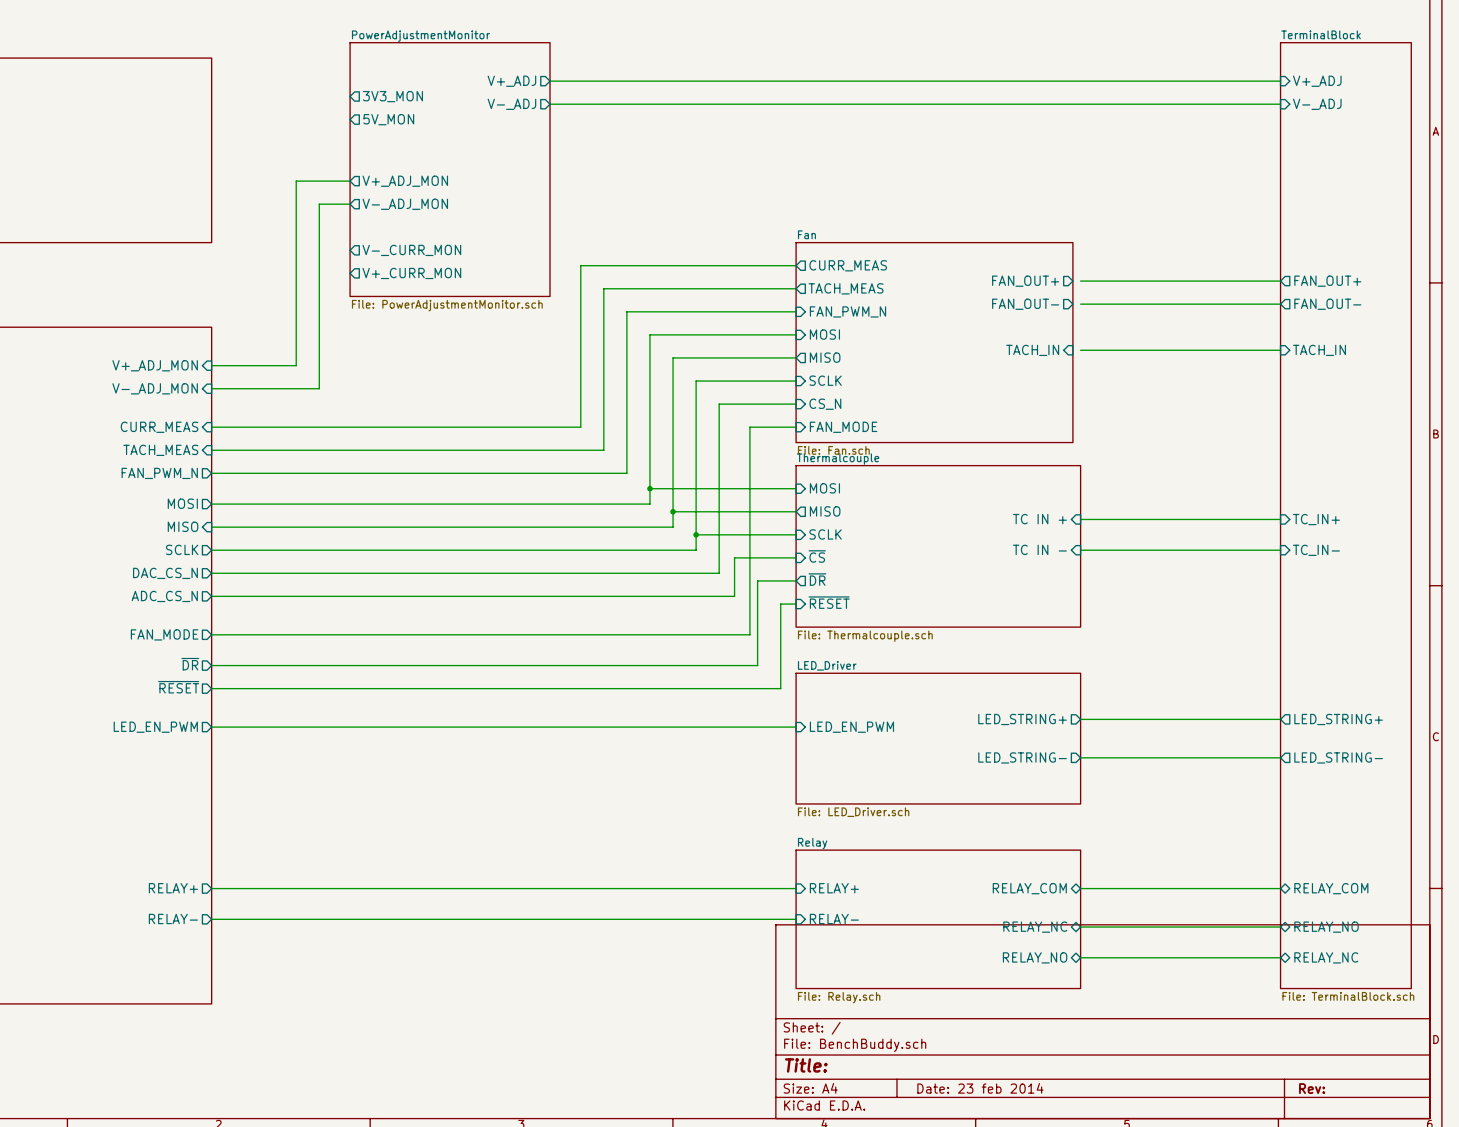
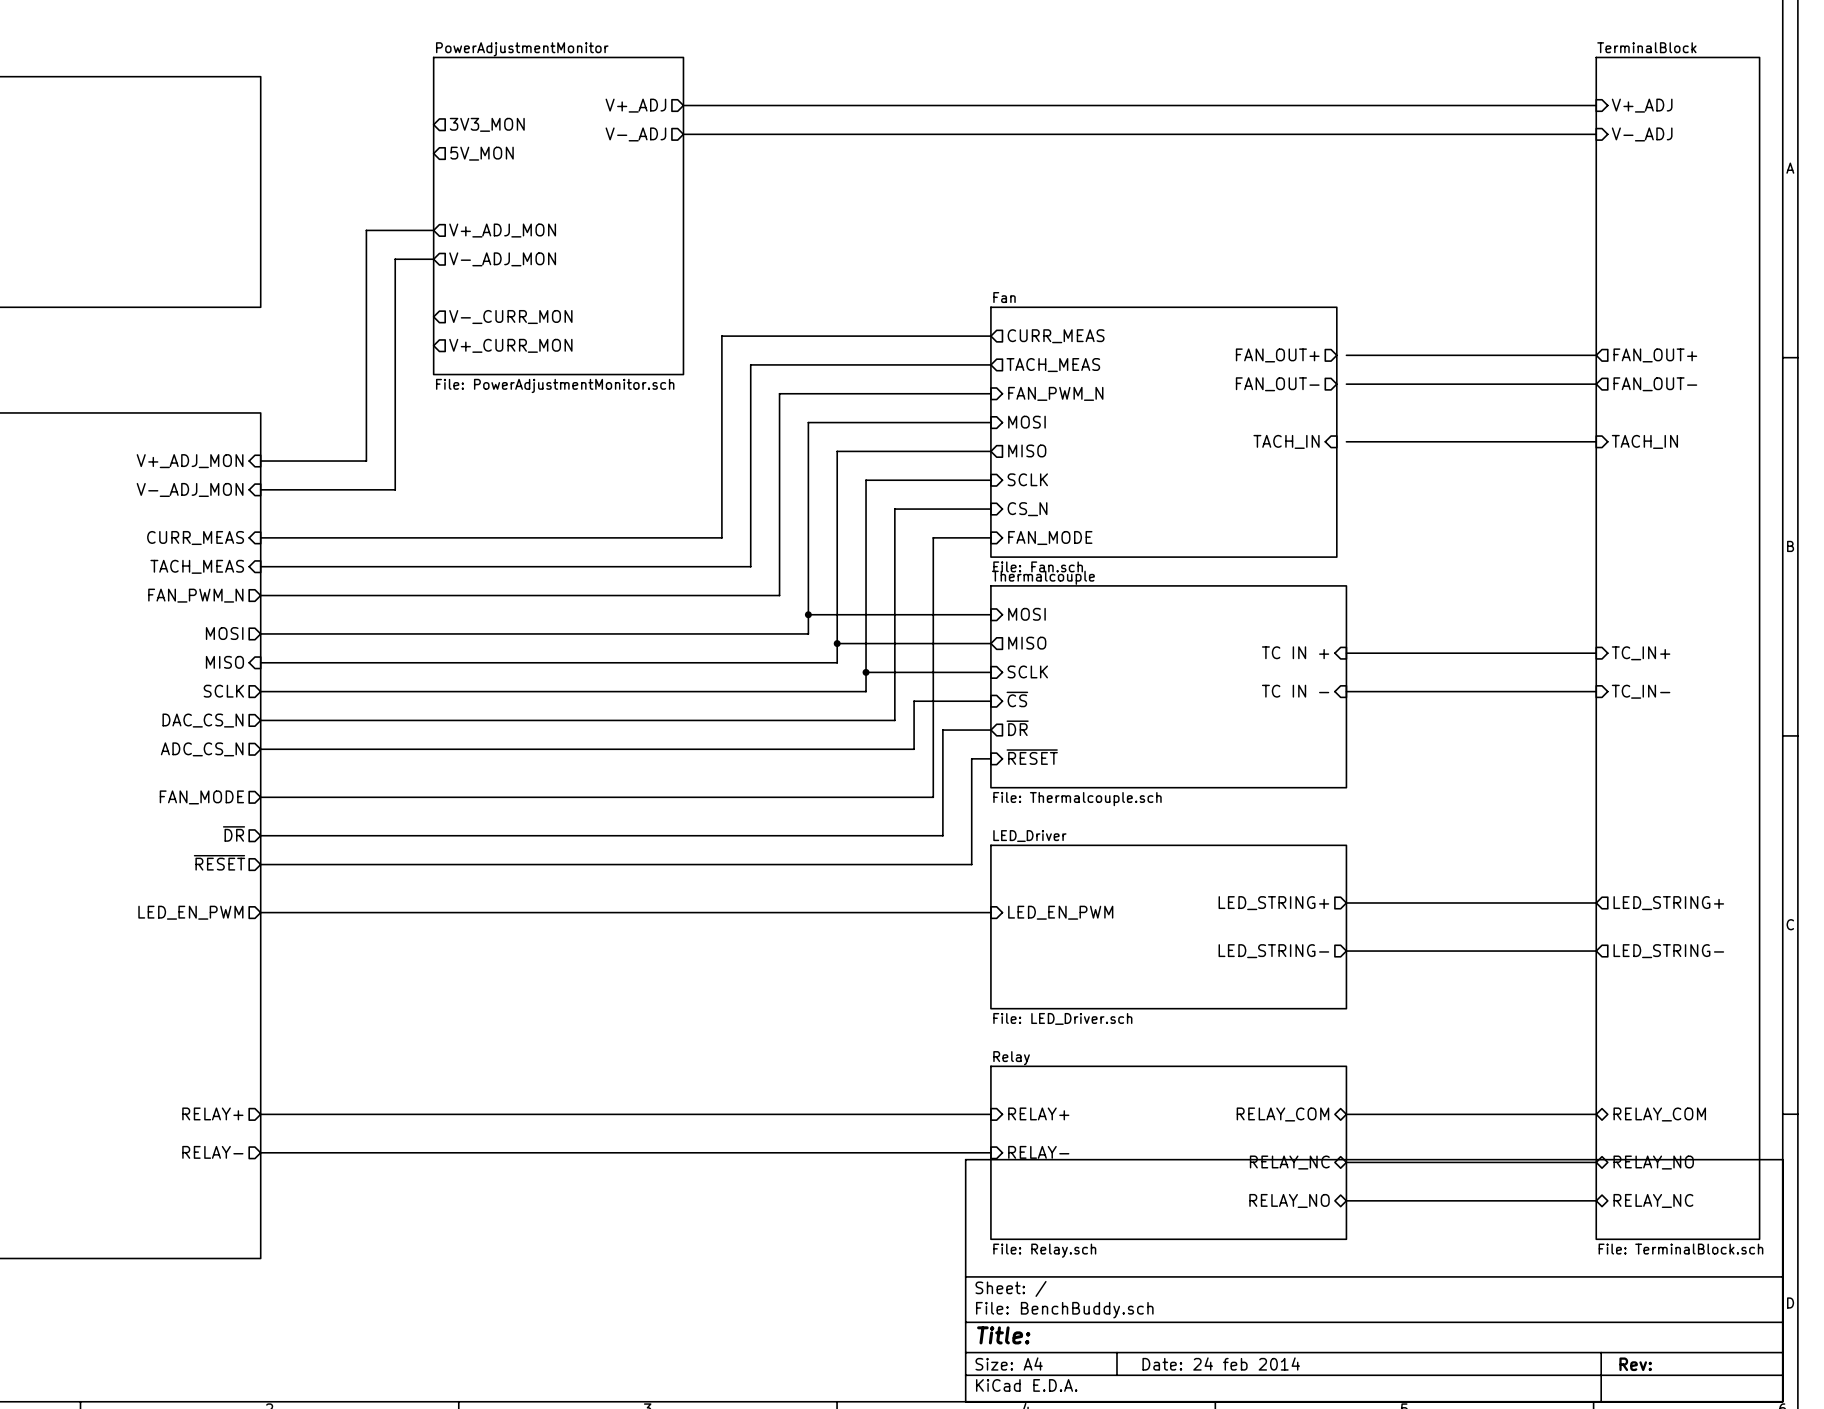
title block: Date: 23 feb 2014 (980, 1088) -> Date: 24 feb 2014 (1221, 1364)

